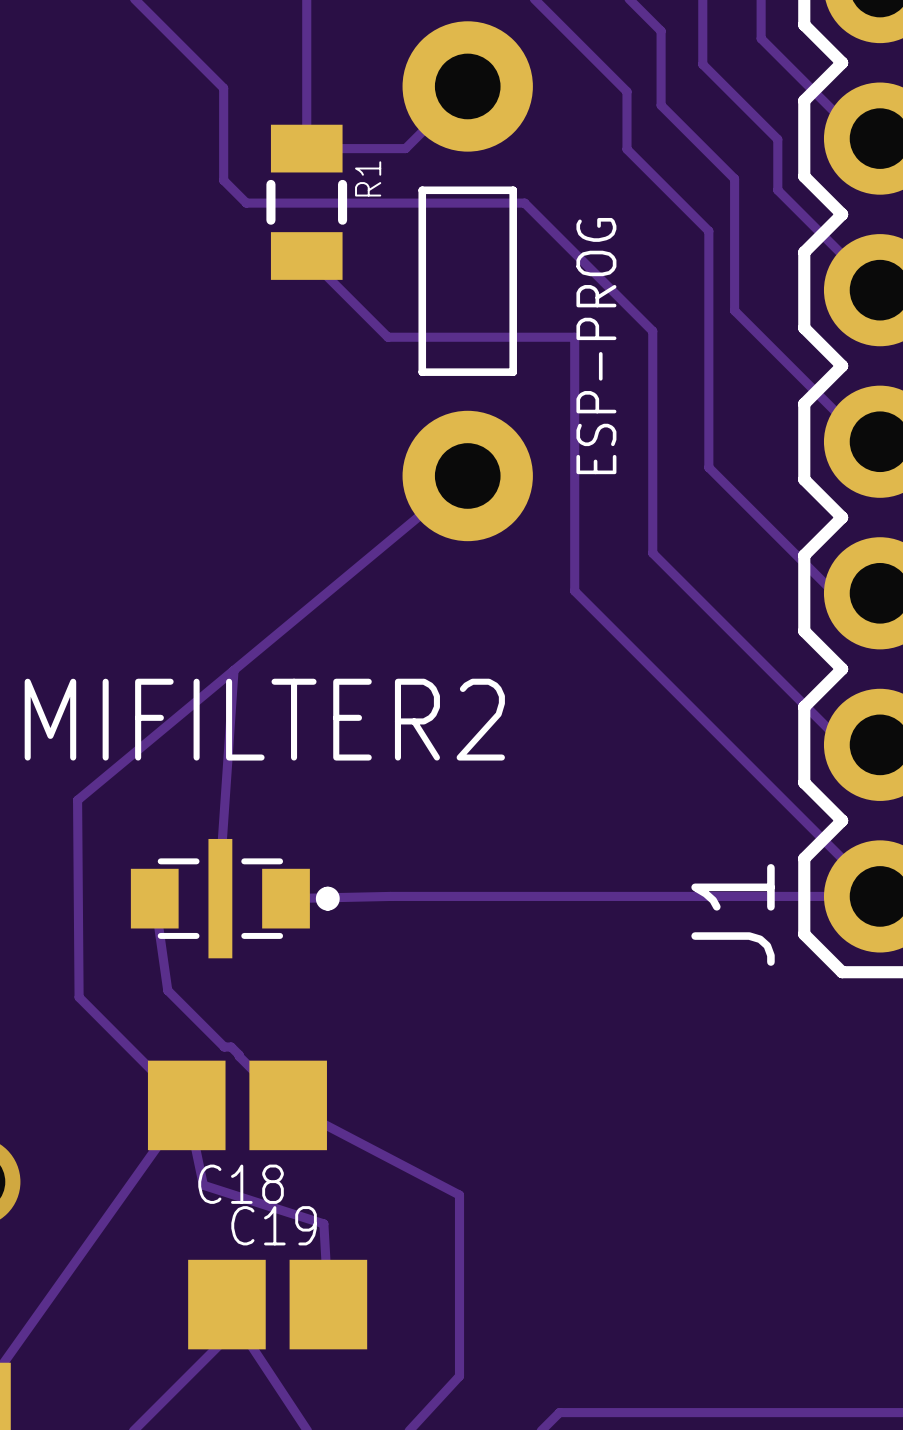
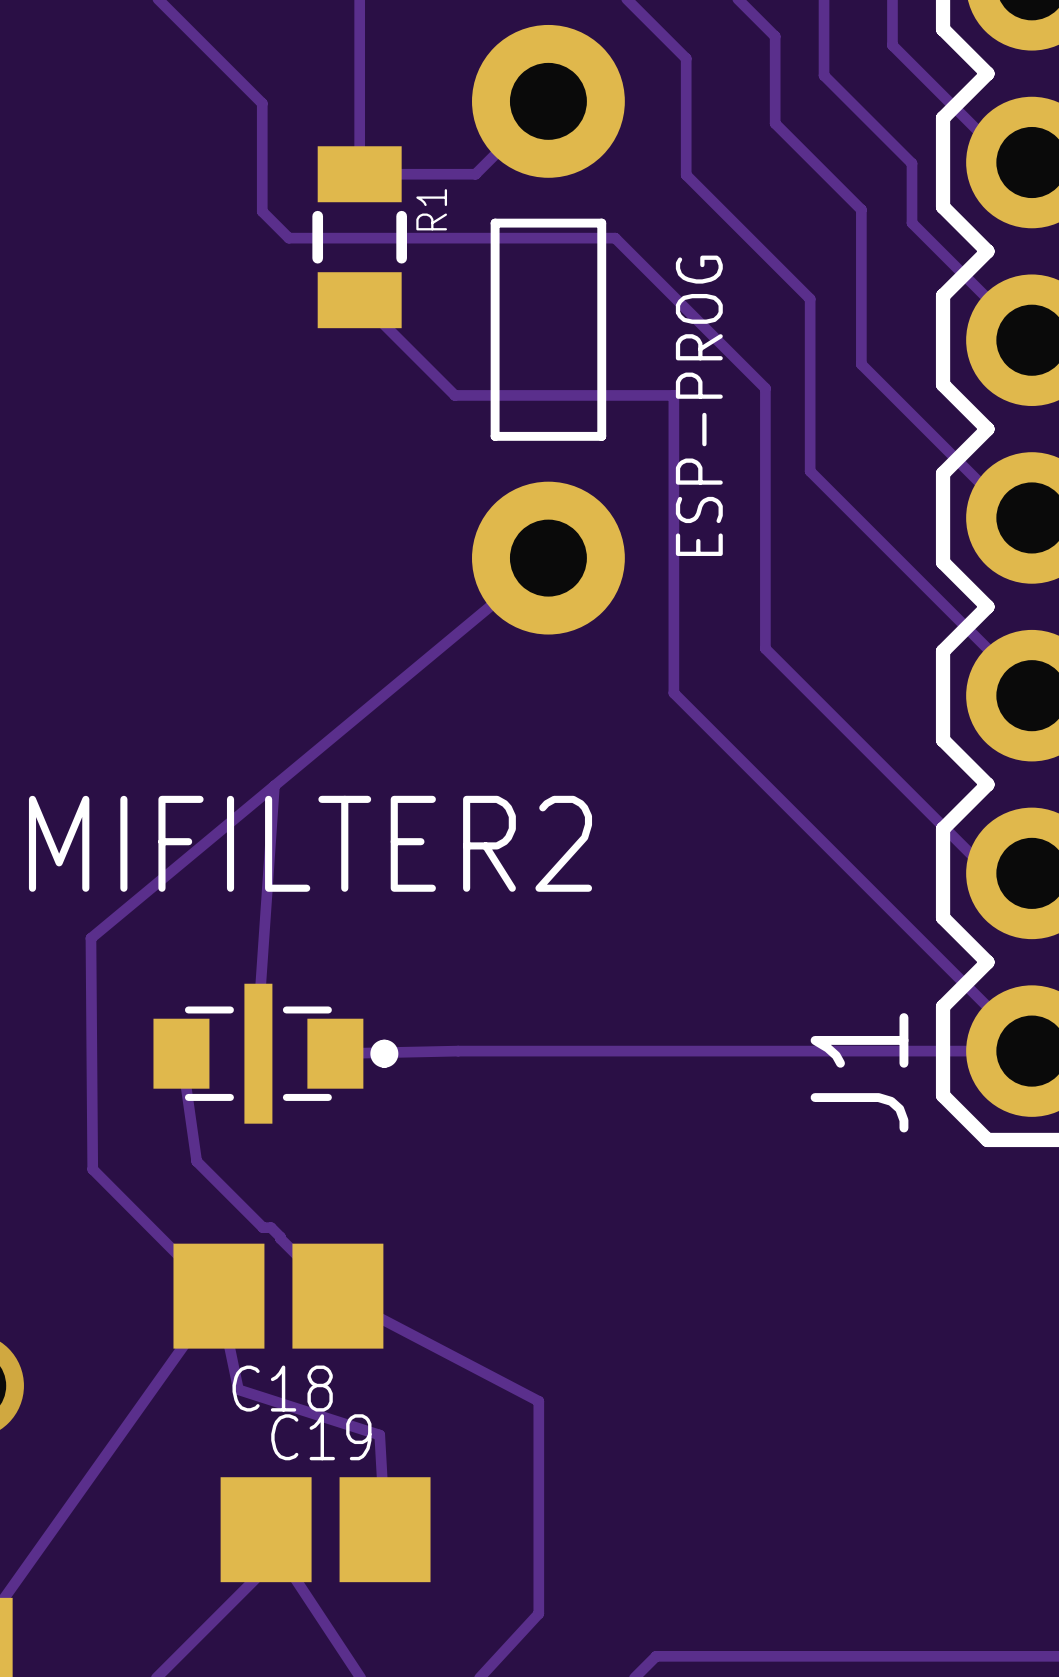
track: (585, 49) (626, 91) (626, 149) (708, 231) (708, 467) (834, 593) (880, 593) -> (686, 58) (686, 175) (810, 299) (810, 471) (1031, 693) (1031, 695)

